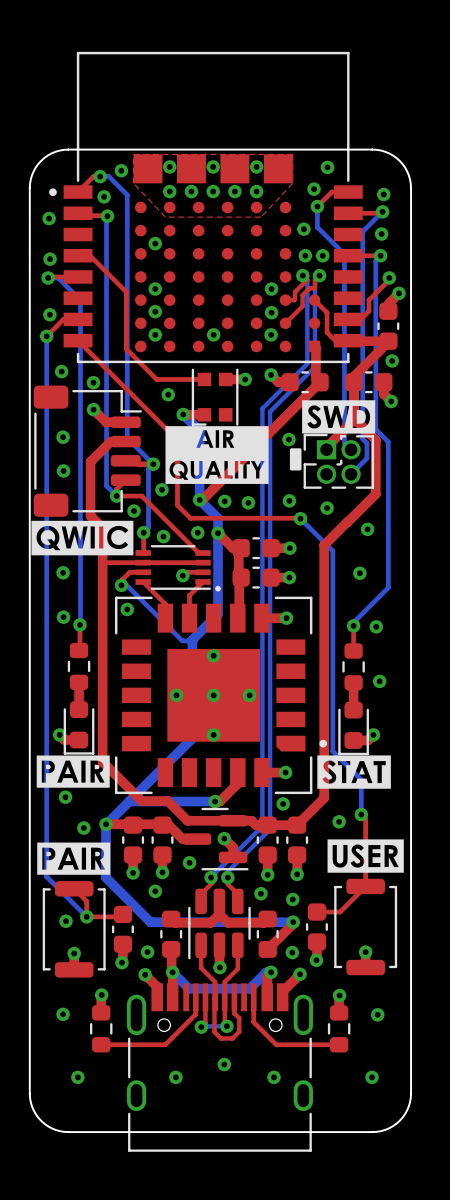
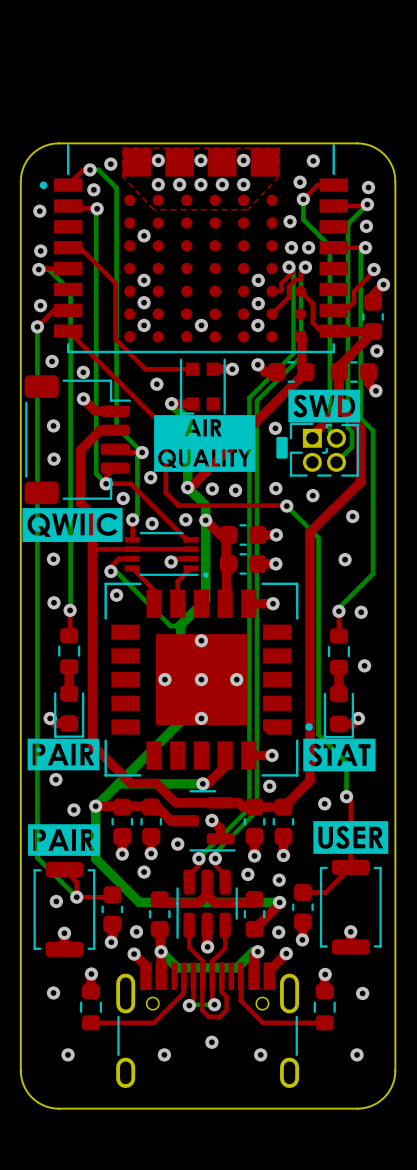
part: (205, 207) -> none
part: none -> (193, 248)
part: (219, 1067) -> none

